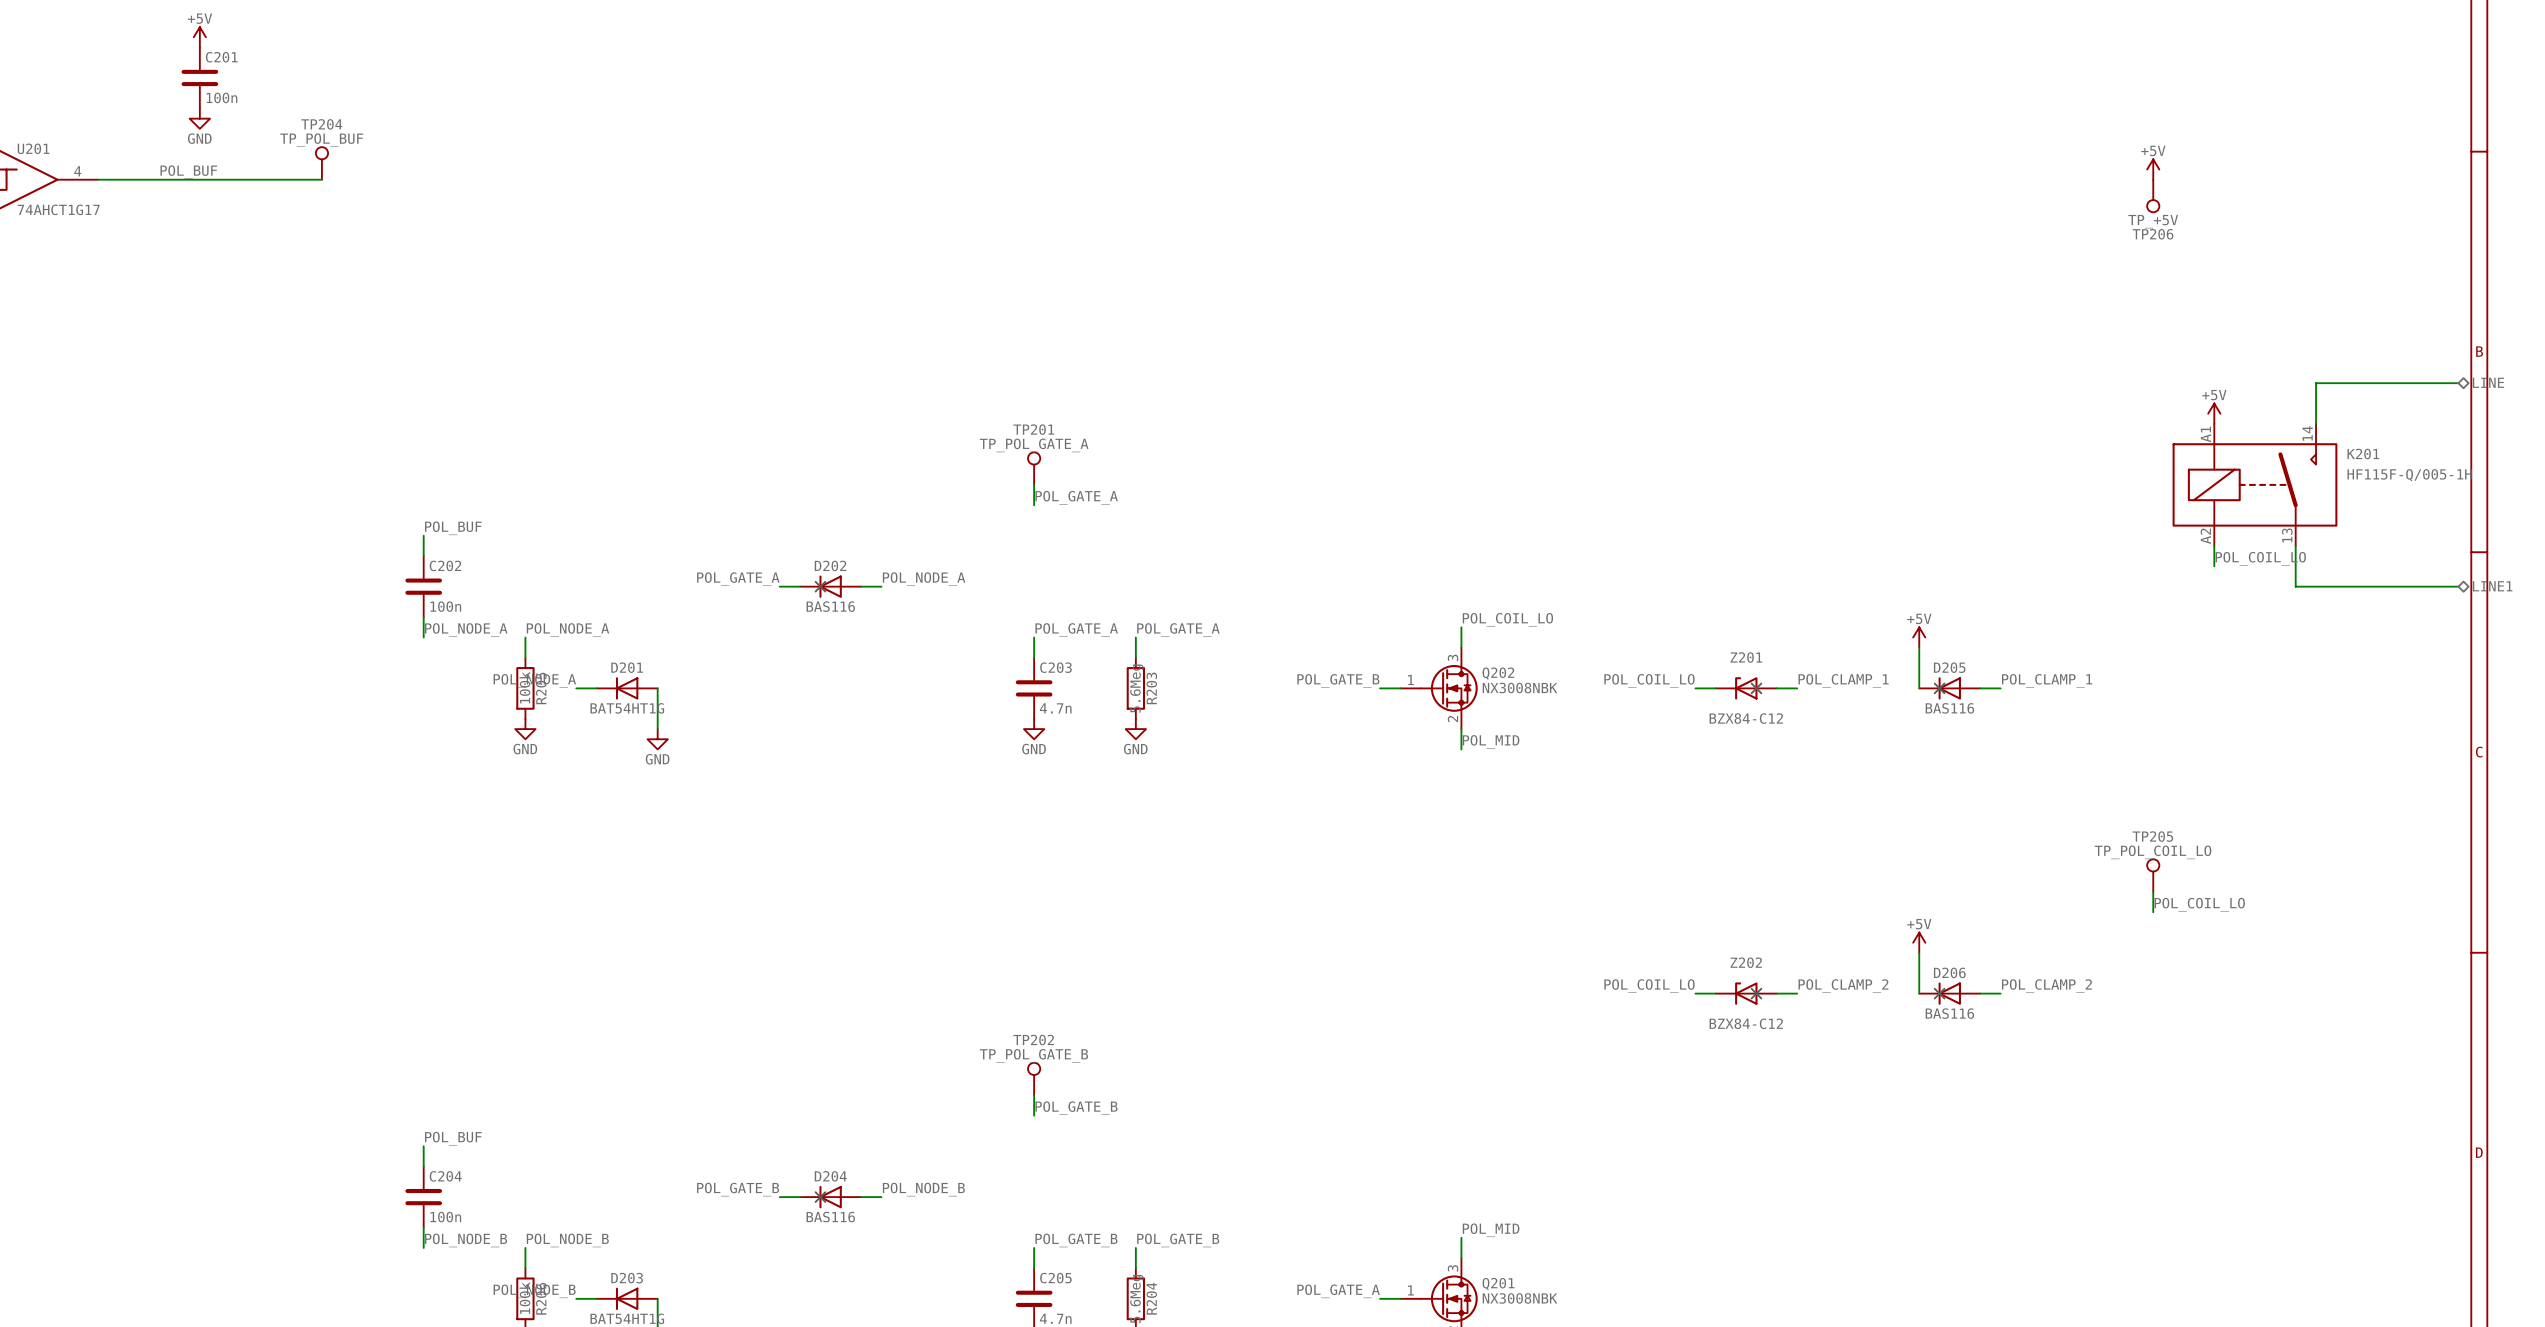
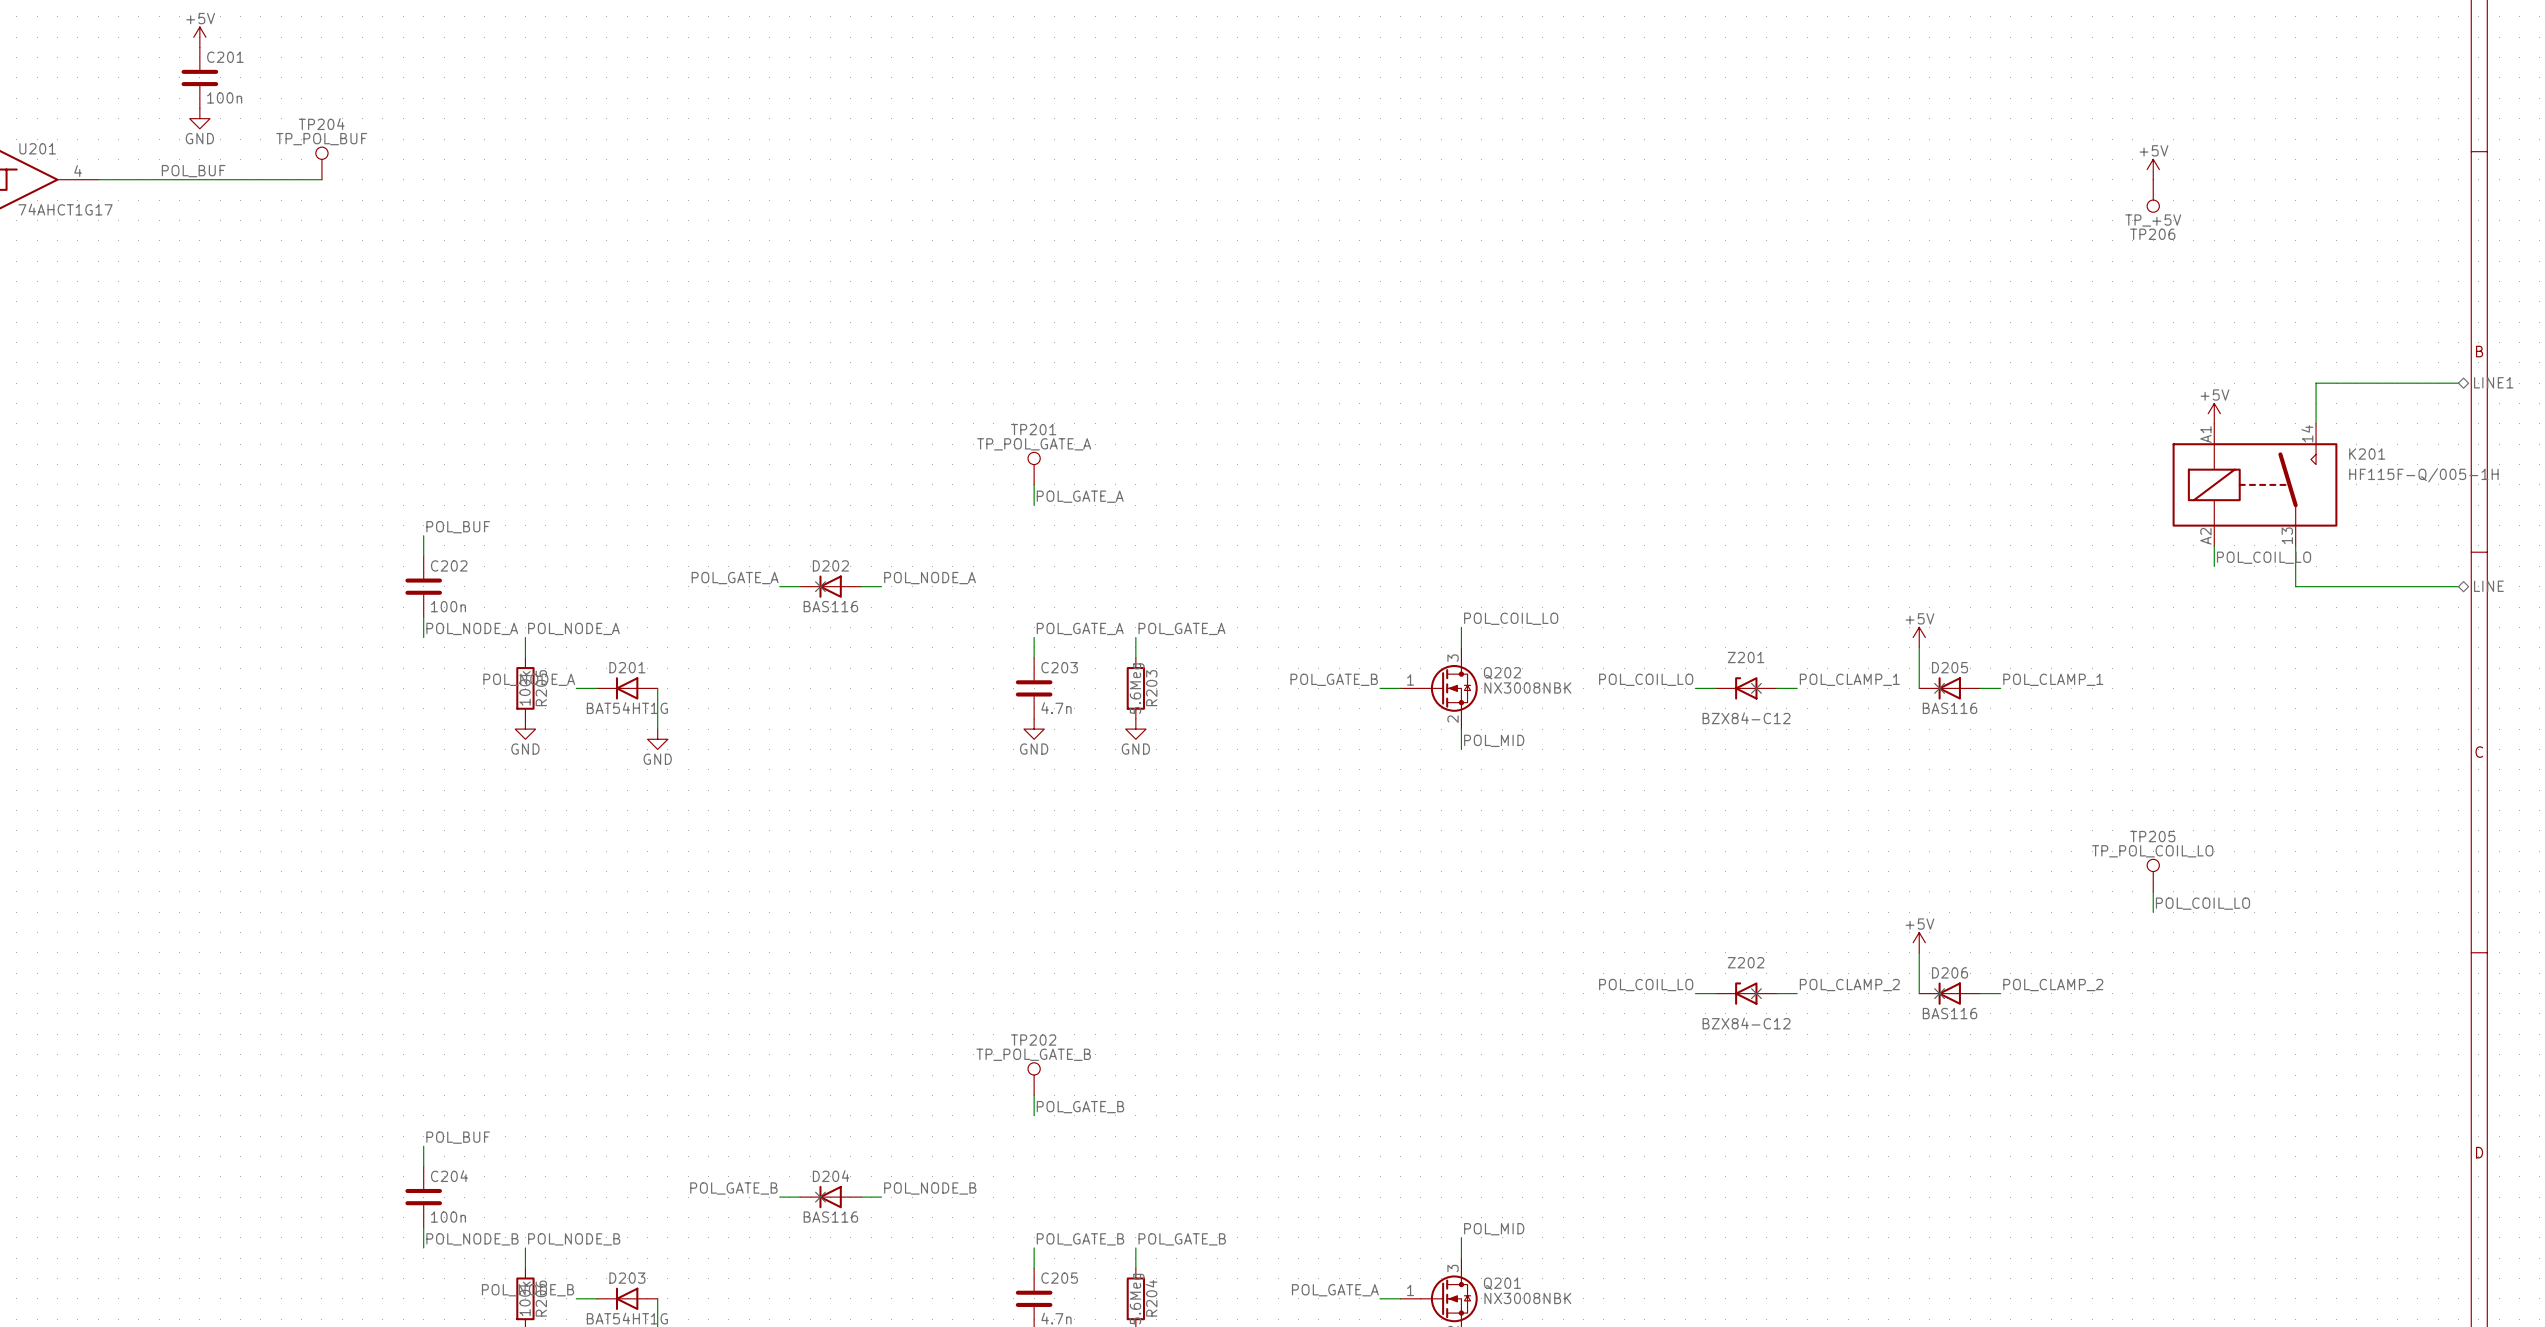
hierarchical label: LINE (2488, 382) -> LINE1 (2493, 382)
hierarchical label: LINE1 (2492, 586) -> LINE (2488, 586)

